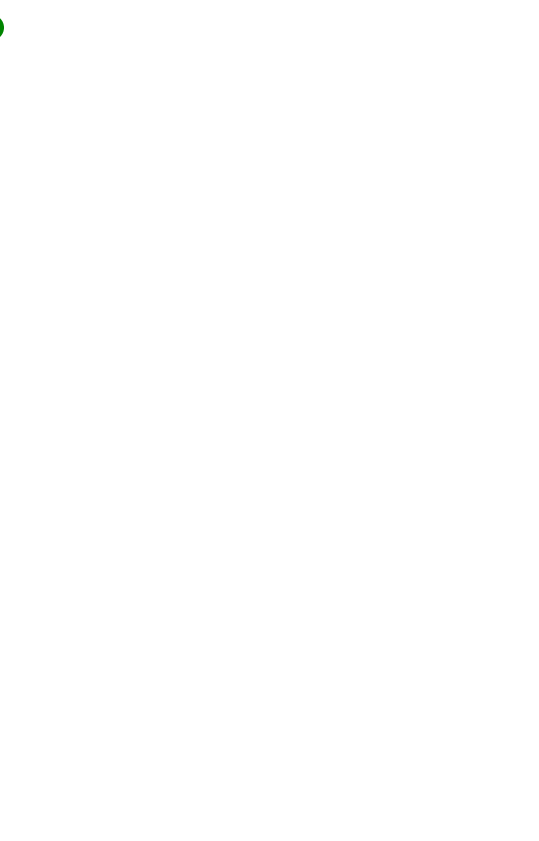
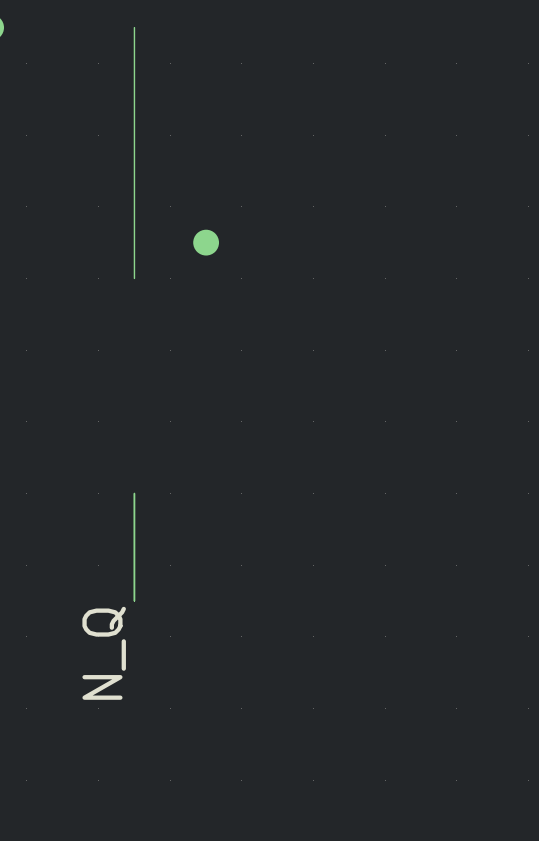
wire: none -> (134, 27) (134, 278)
junction: none -> (206, 242)
wire: none -> (134, 493) (134, 600)
label: none -> N_Q (104, 653)

